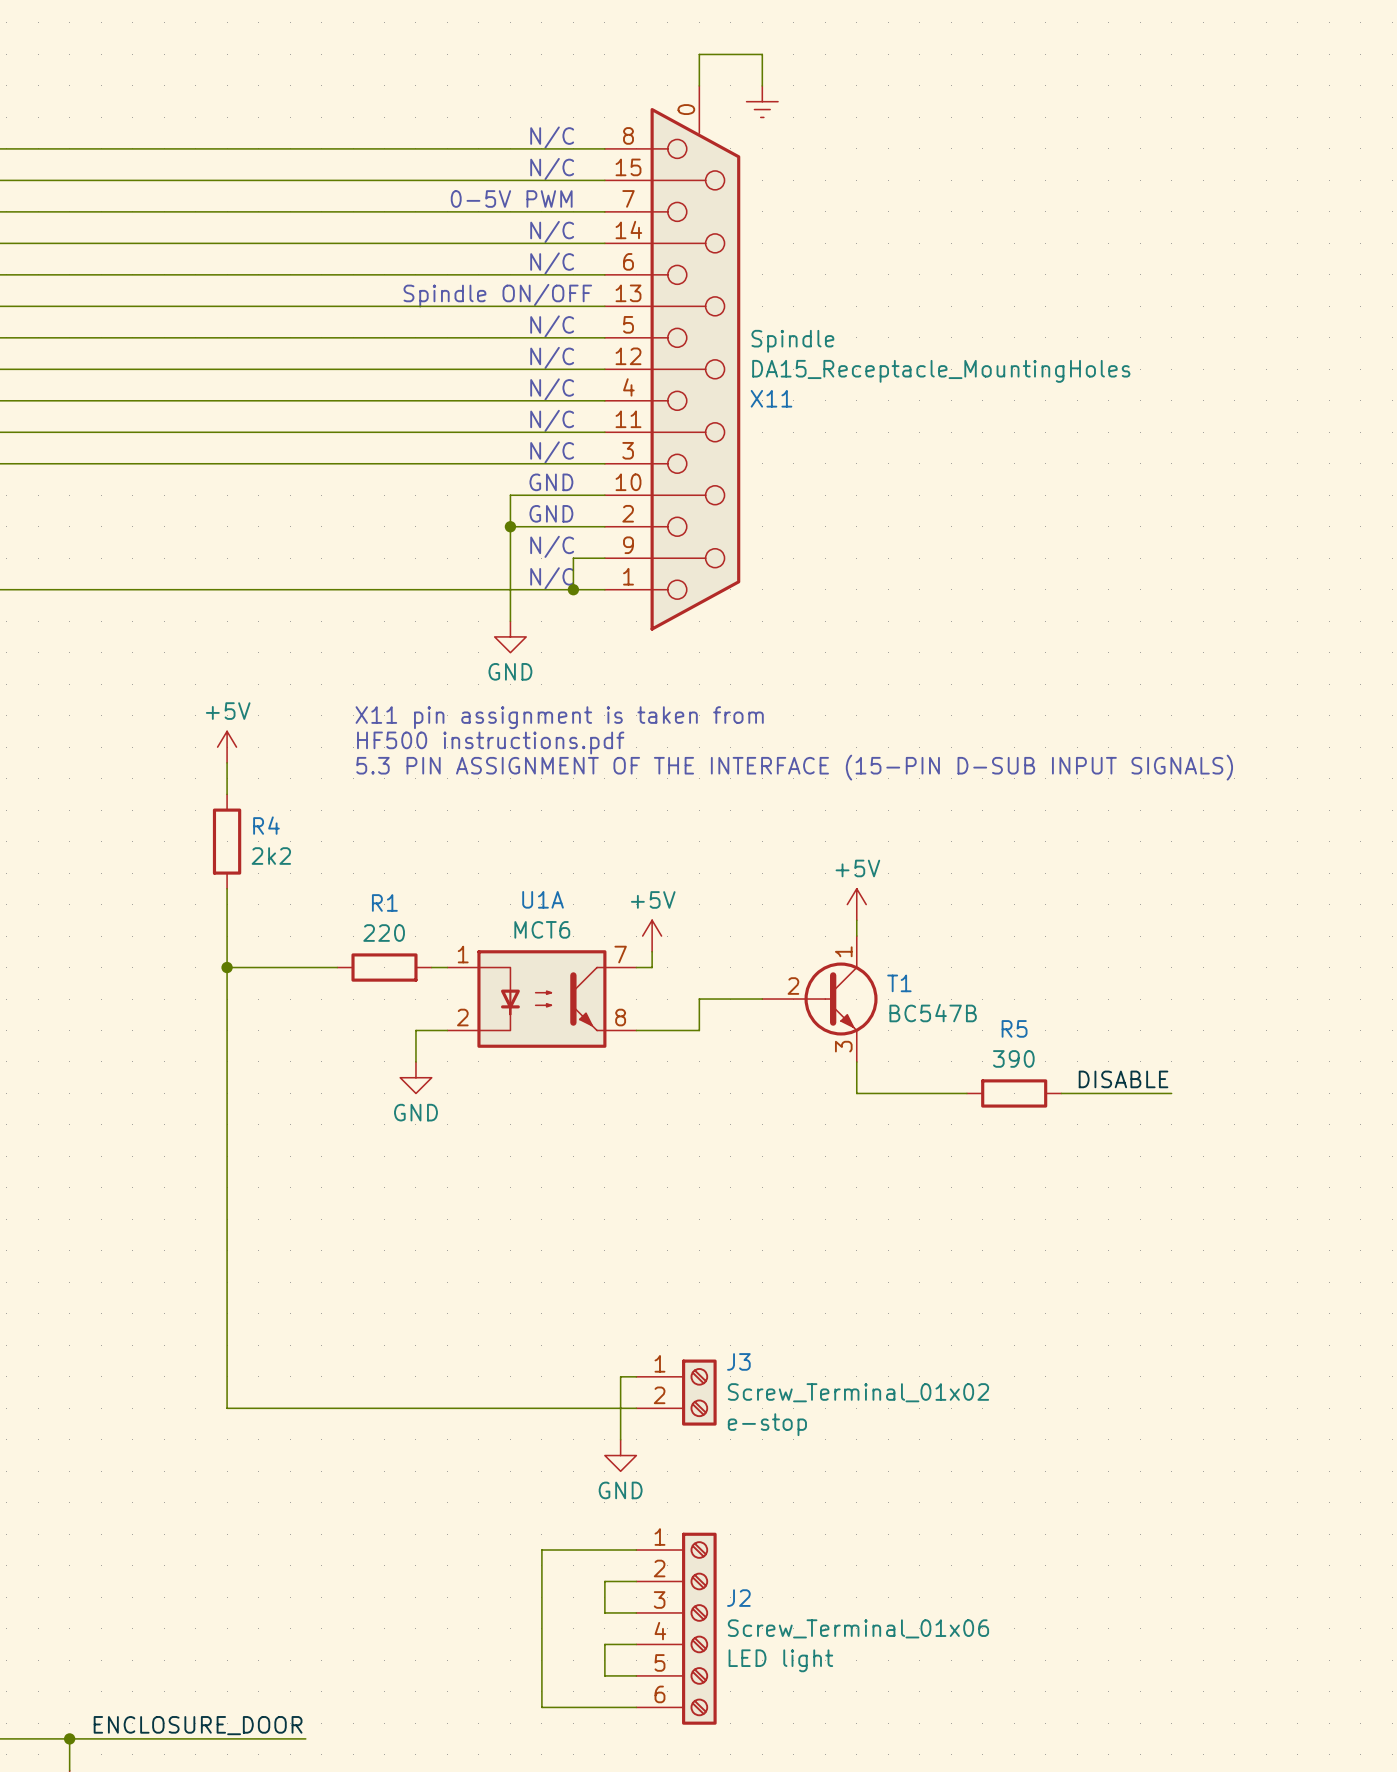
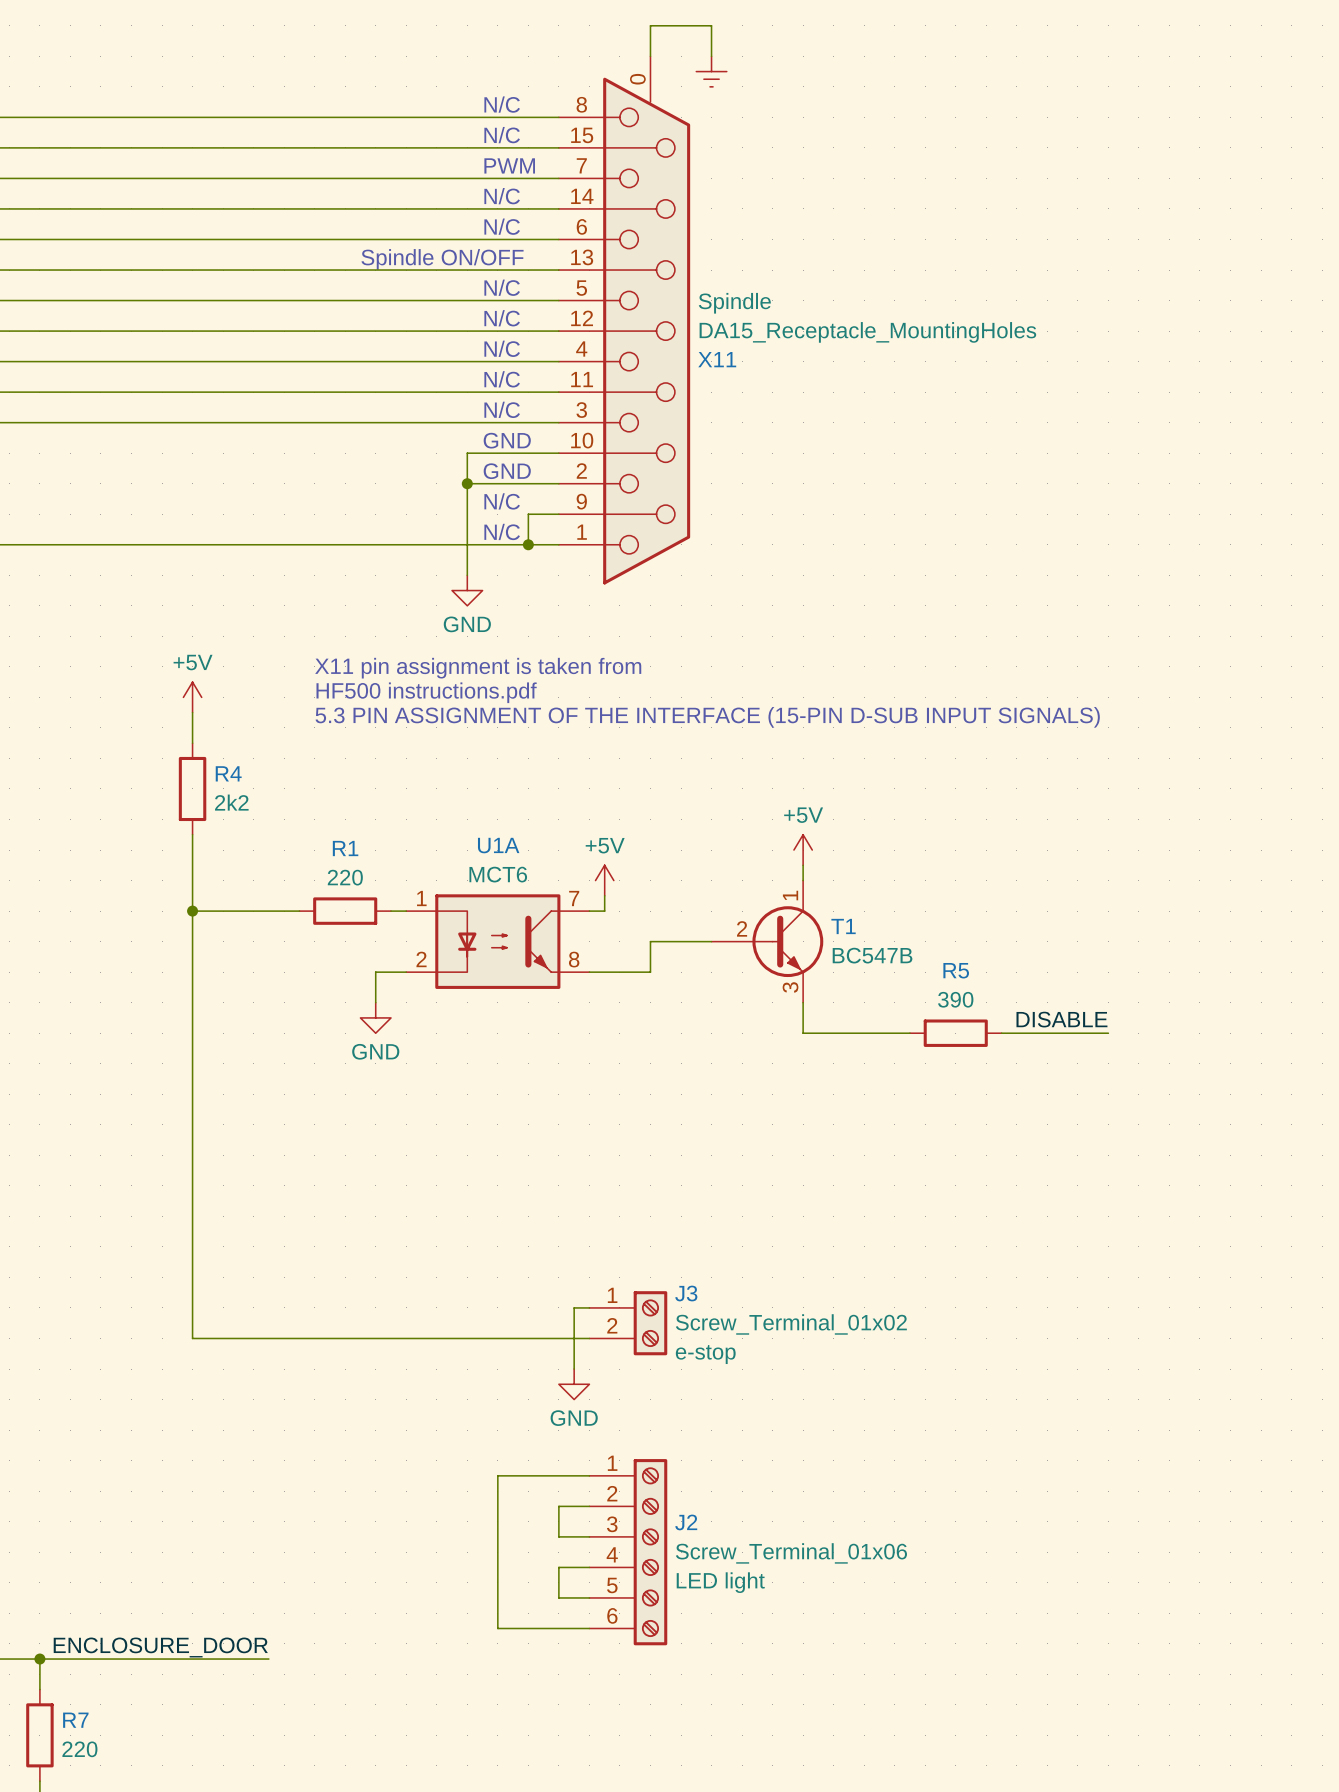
text: 0-5V PWM (511, 198) -> none
text: none -> PWM (509, 165)

